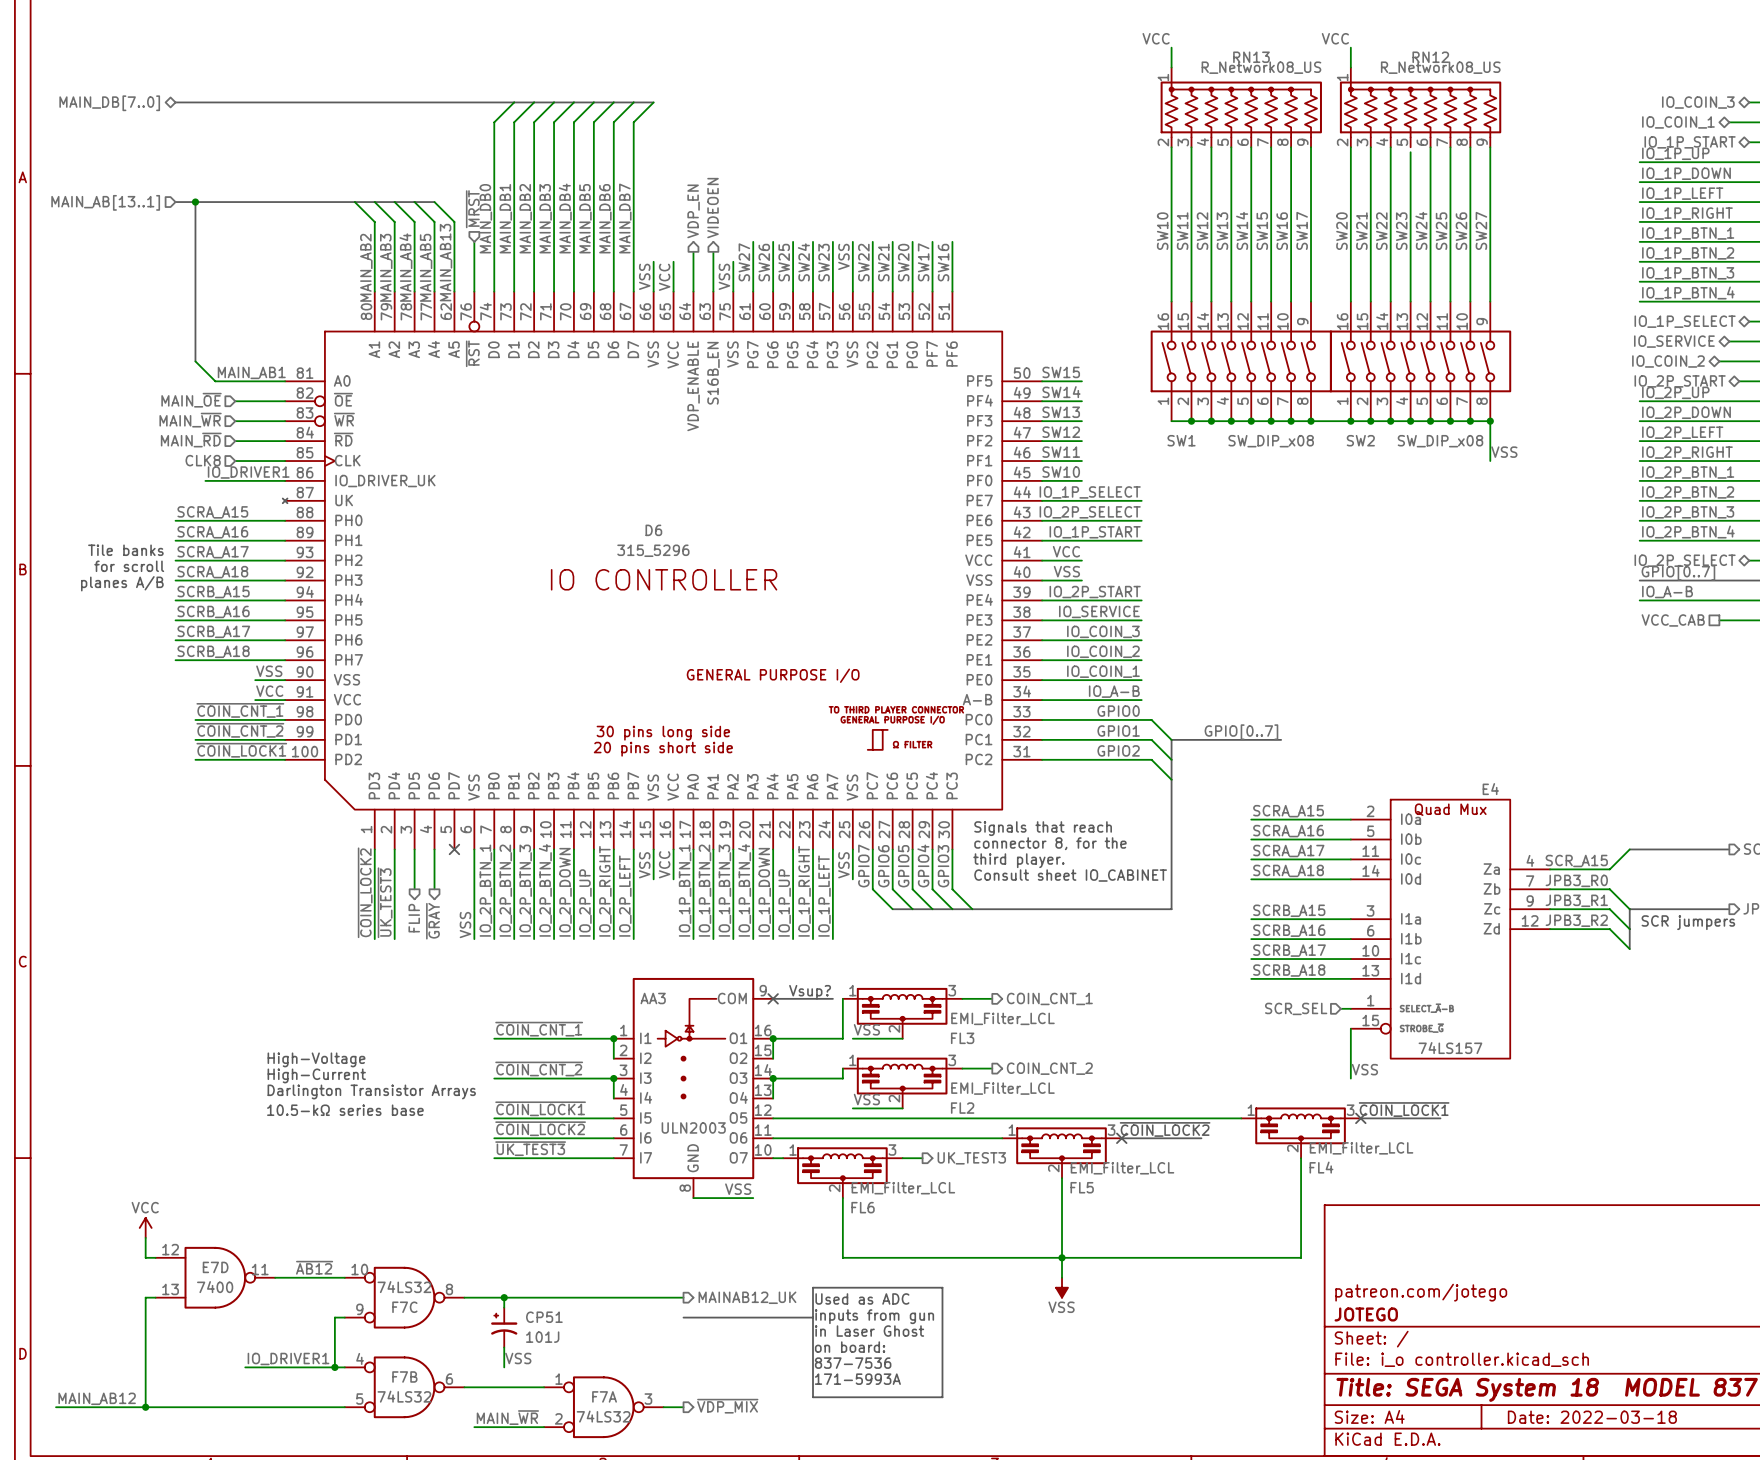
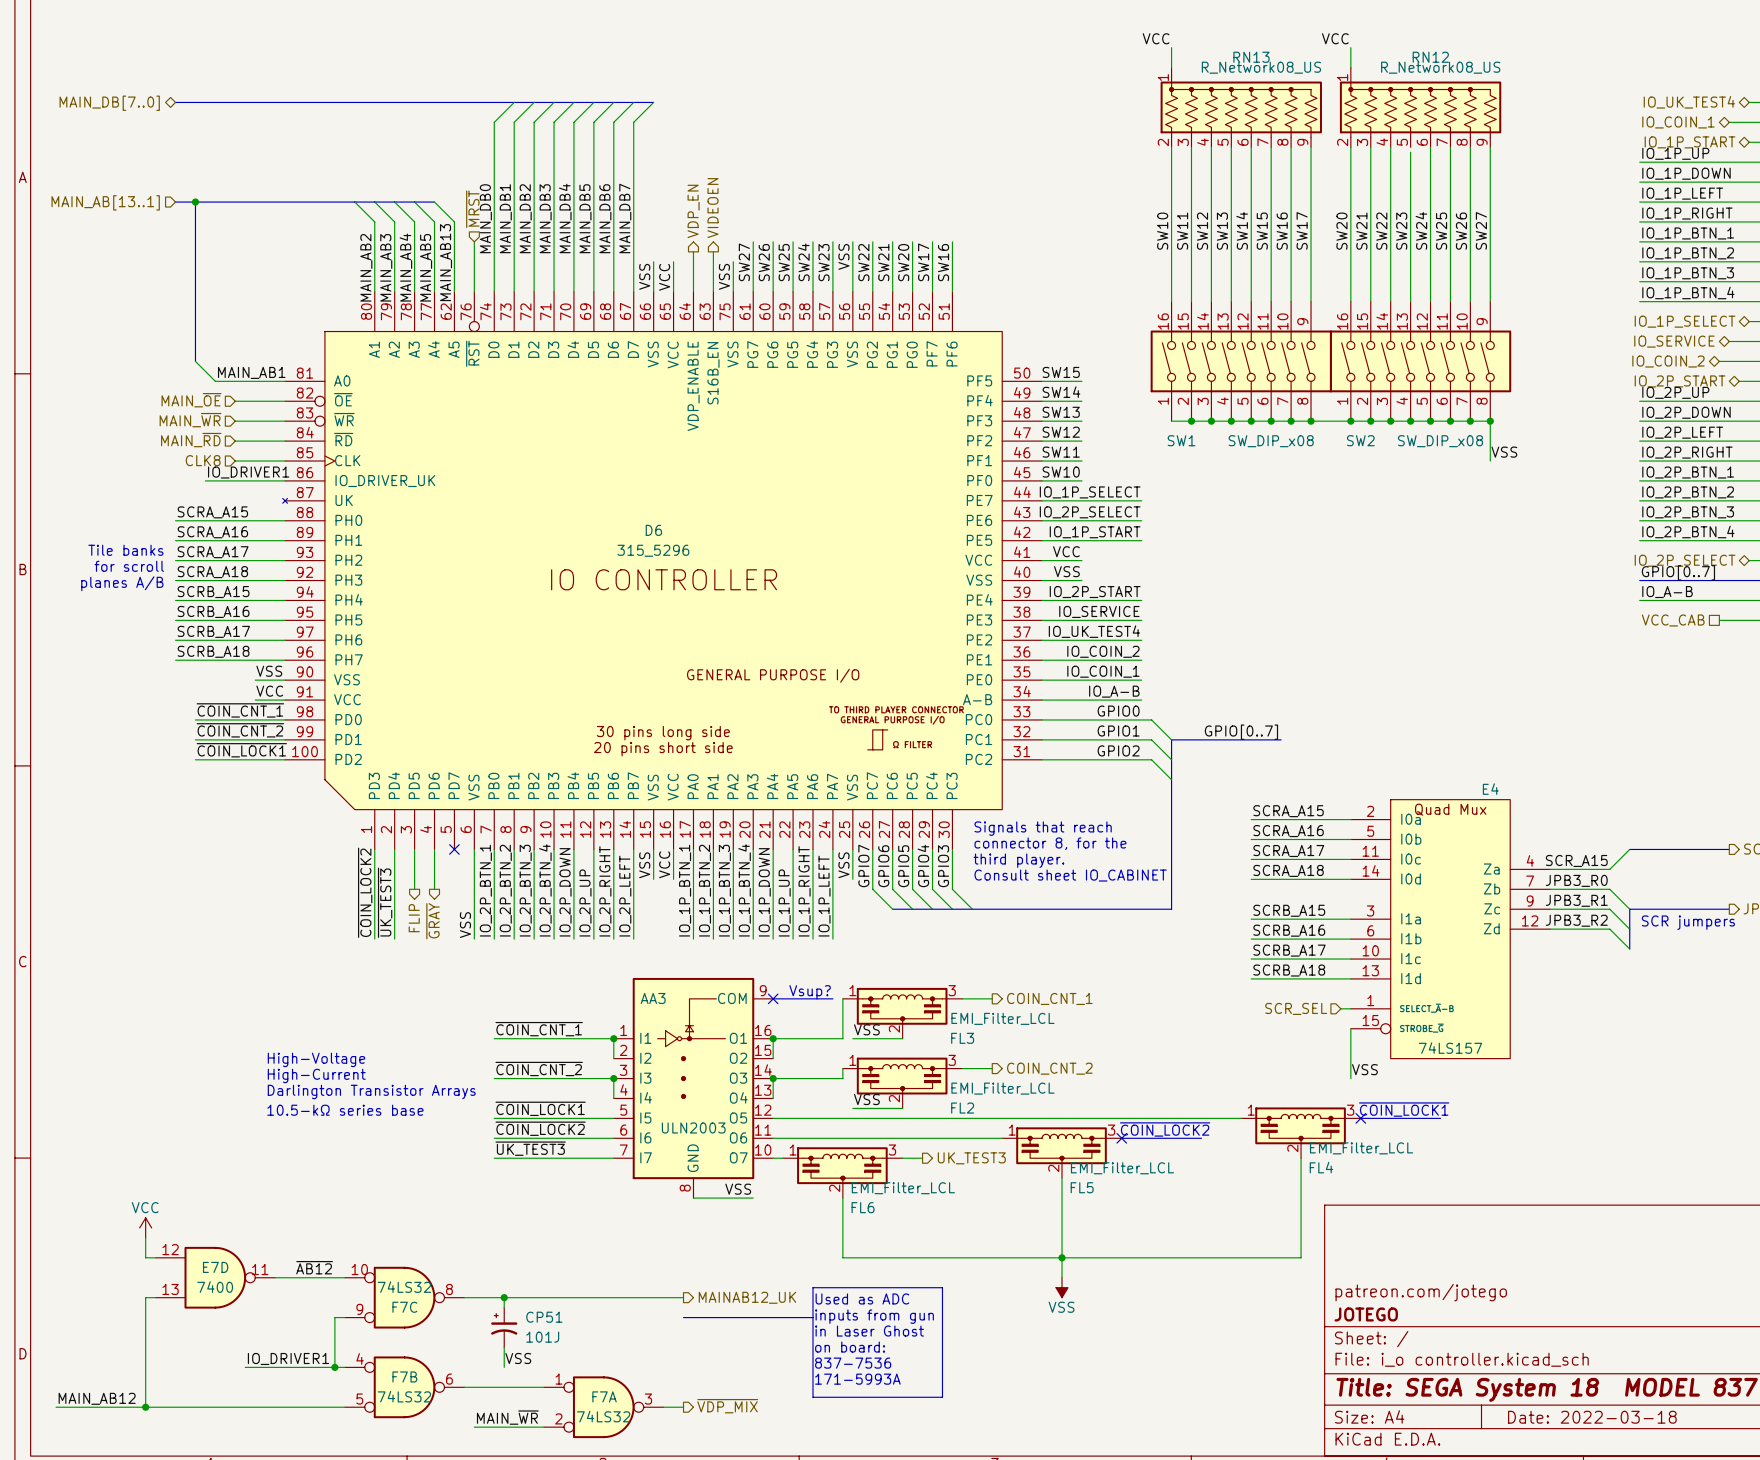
hierarchical label: IO_COIN_3 (1698, 102) -> IO_UK_TEST4 (1689, 102)
label: IO_COIN_3 (1103, 631) -> IO_UK_TEST4 (1094, 631)

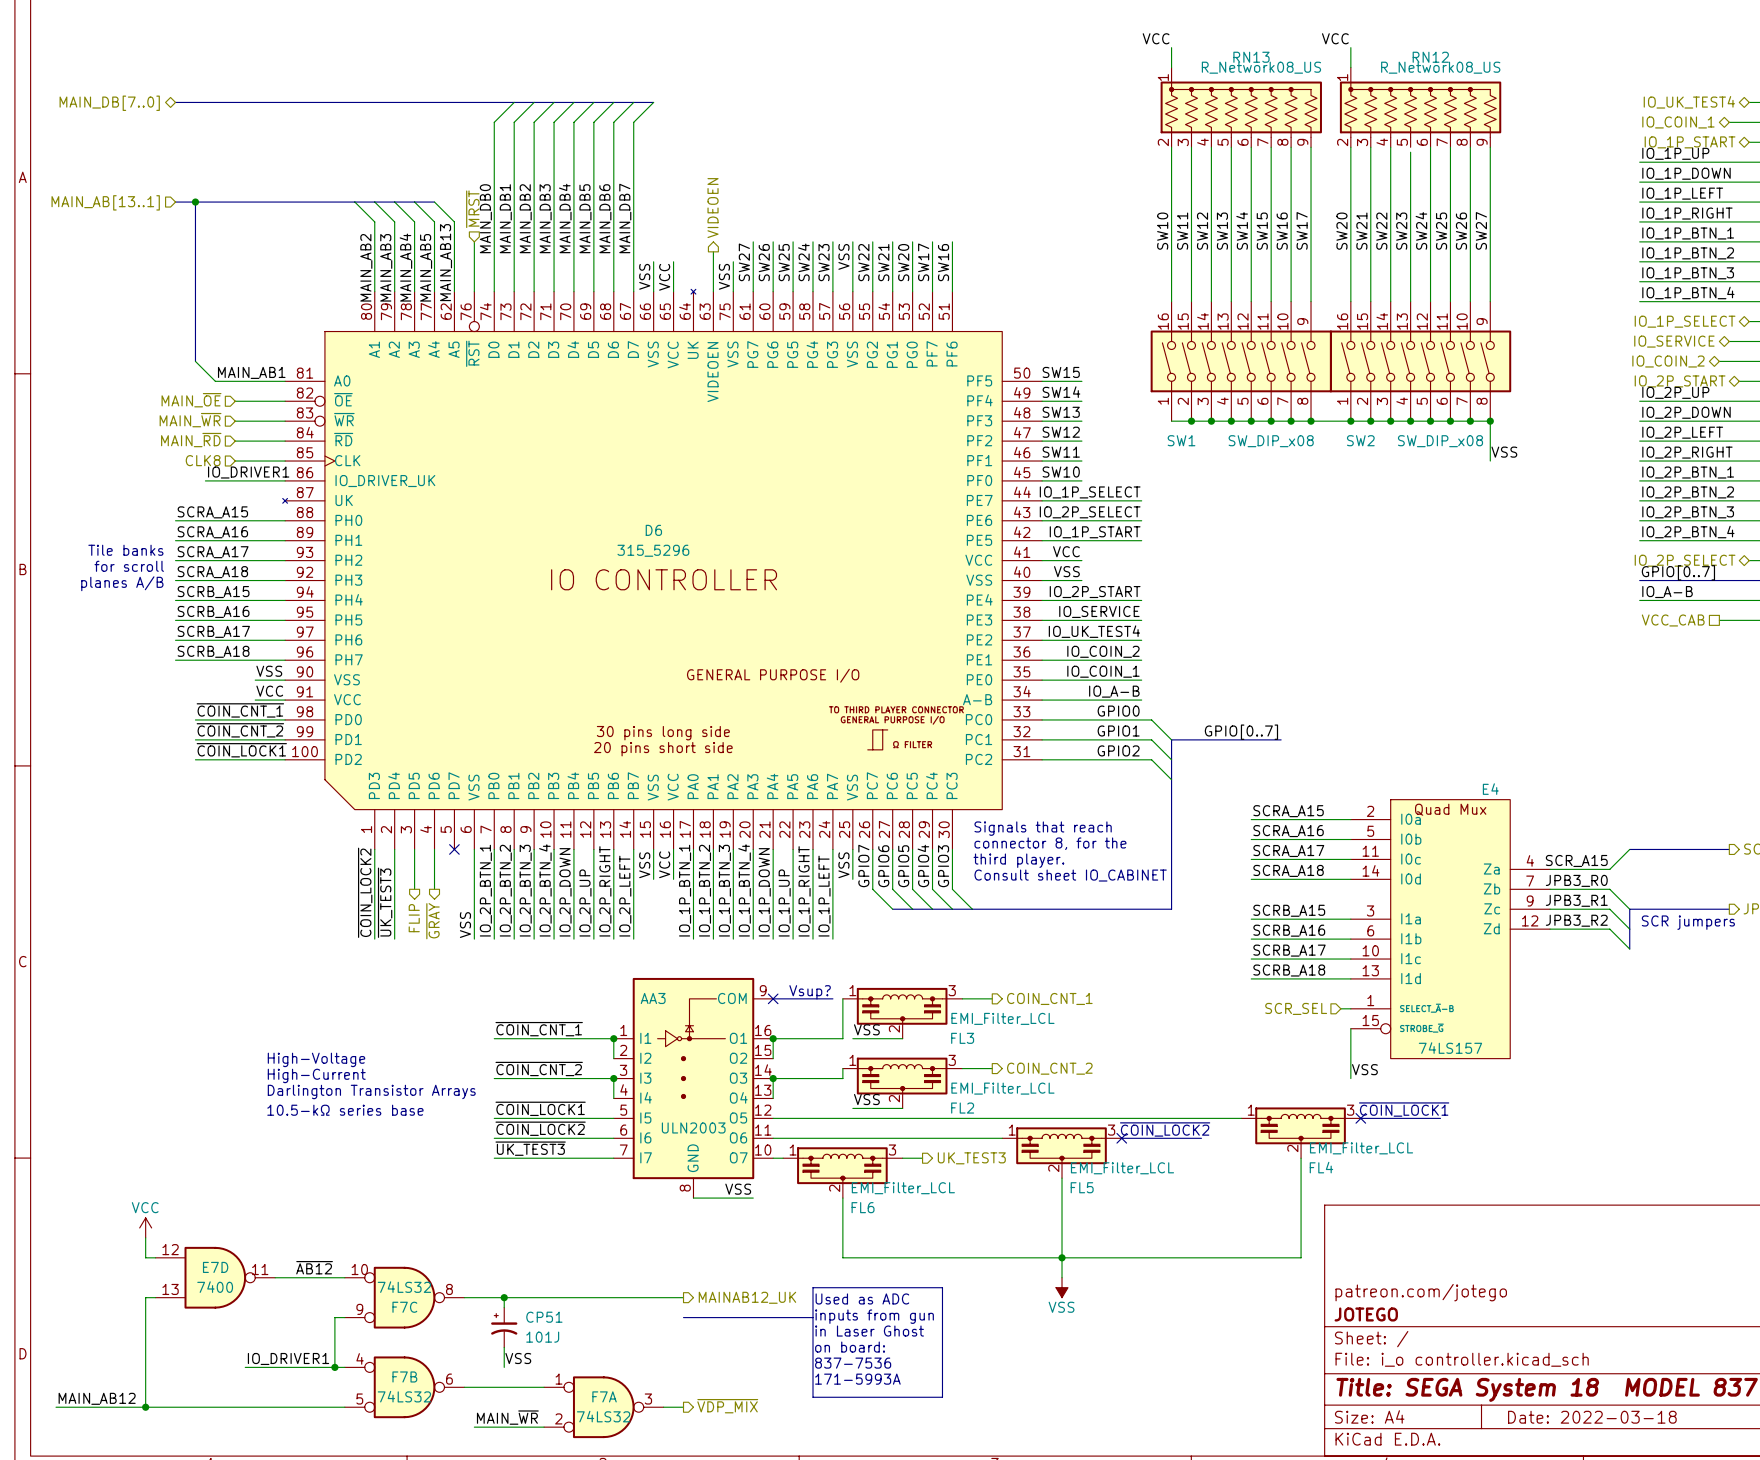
hierarchical label: VDP_EN (693, 211) -> none
wire: (693, 251) (693, 291) -> none
D6 symbol: [282, 291, 1043, 850] -> [282, 289, 1043, 850]

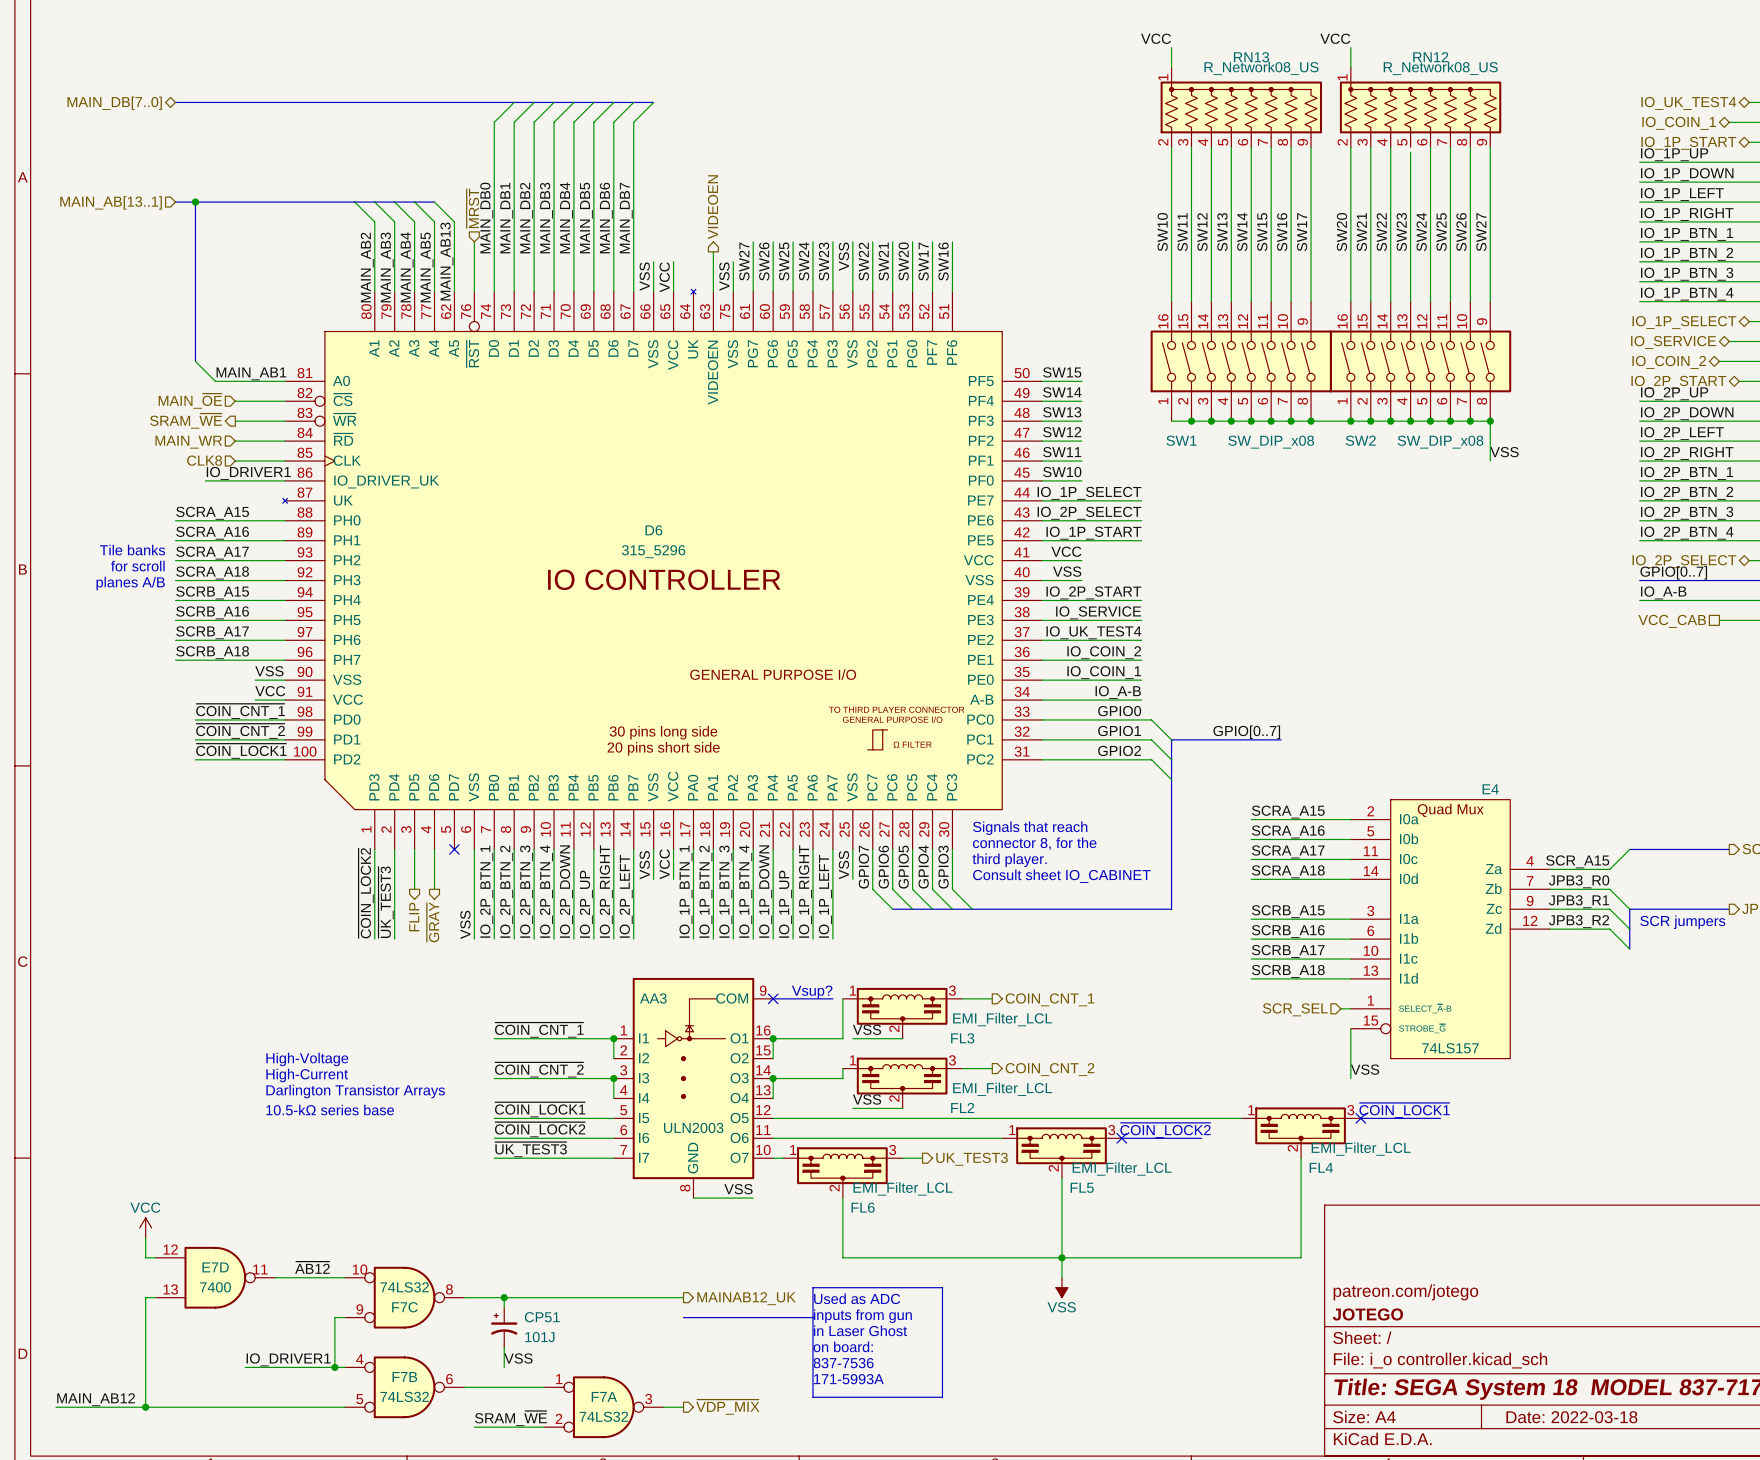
D6 pin name: ~{OE} (343, 399) -> ~{CS} (343, 399)
hierarchical label shape: input (190, 420) -> output (186, 421)
hierarchical label: MAIN_~{WR} (190, 420) -> SRAM_~{WE} (186, 421)
hierarchical label: MAIN_~{RD} (191, 440) -> MAIN_WR (188, 442)
label: MAIN_~{WR} (507, 1417) -> SRAM_~{WE} (510, 1418)

